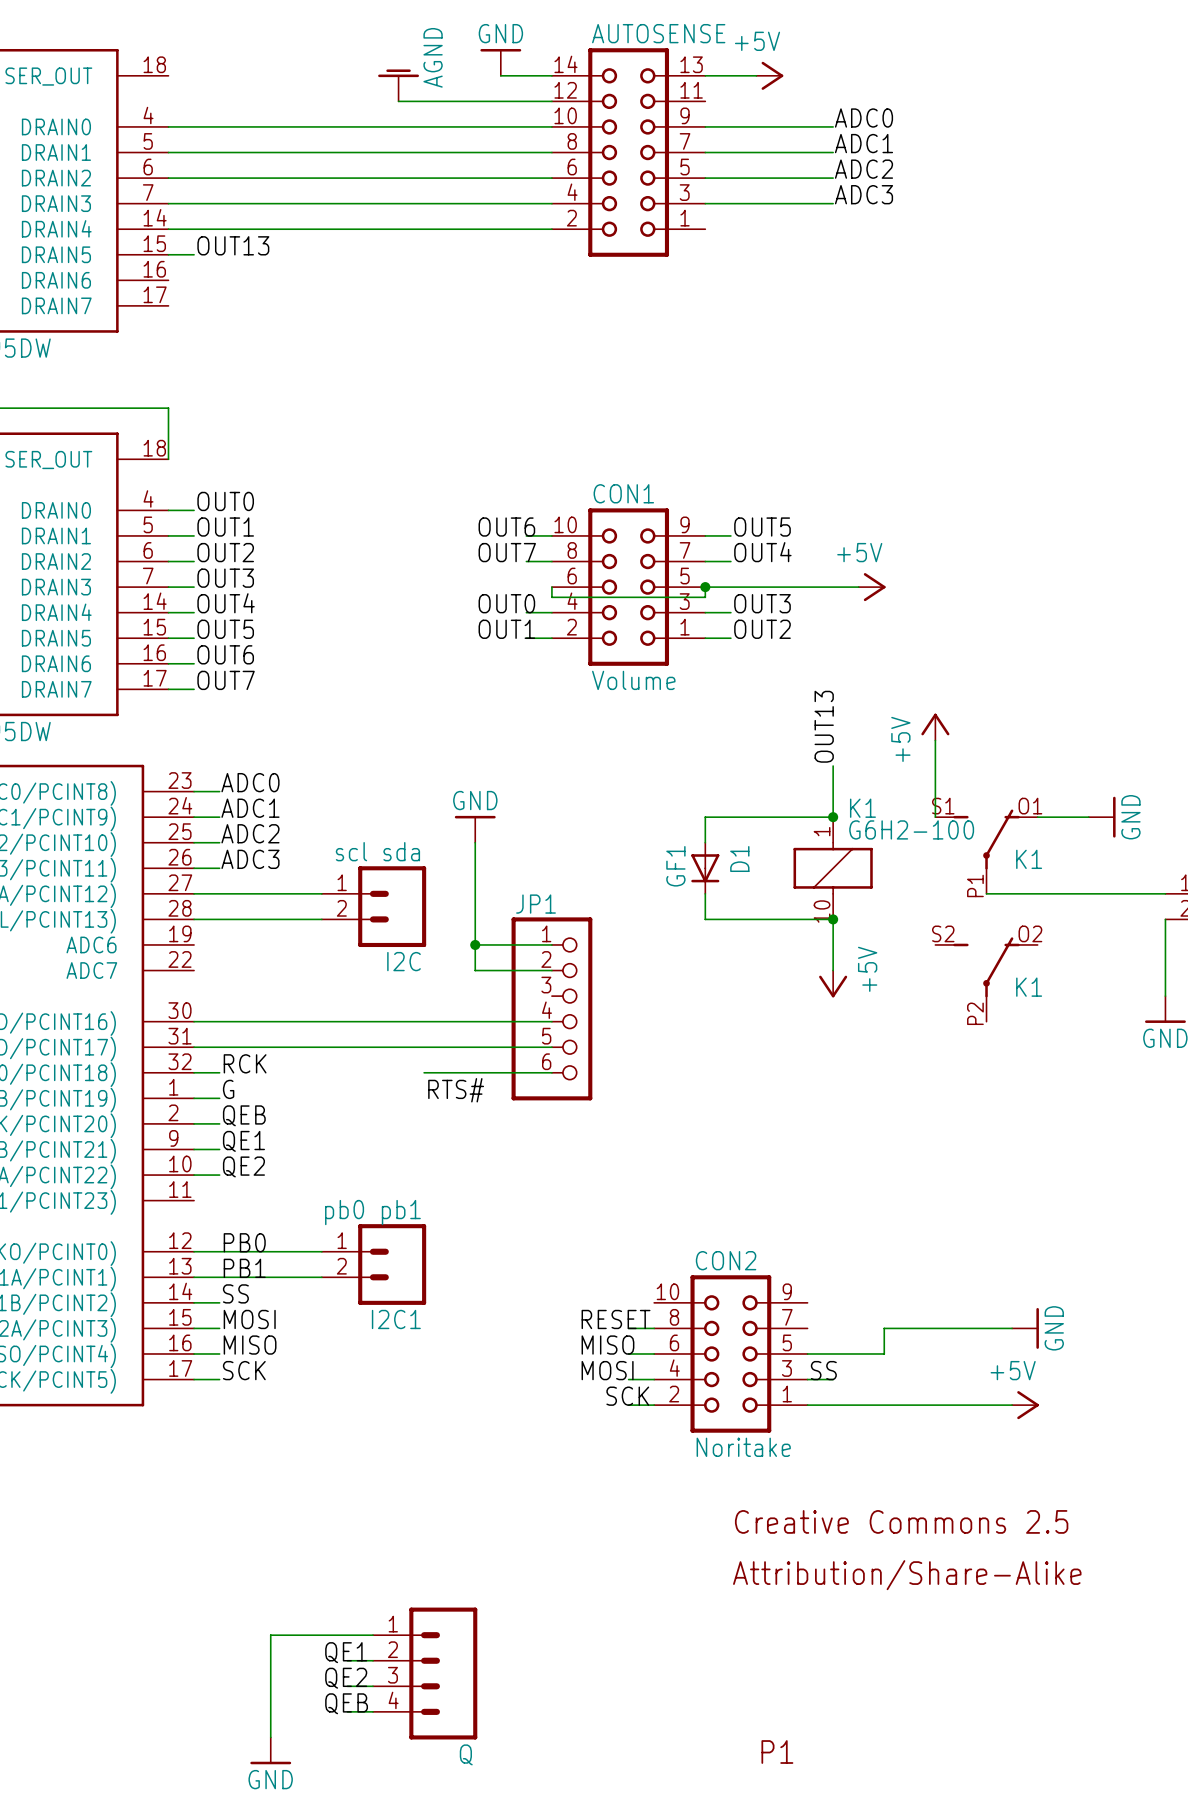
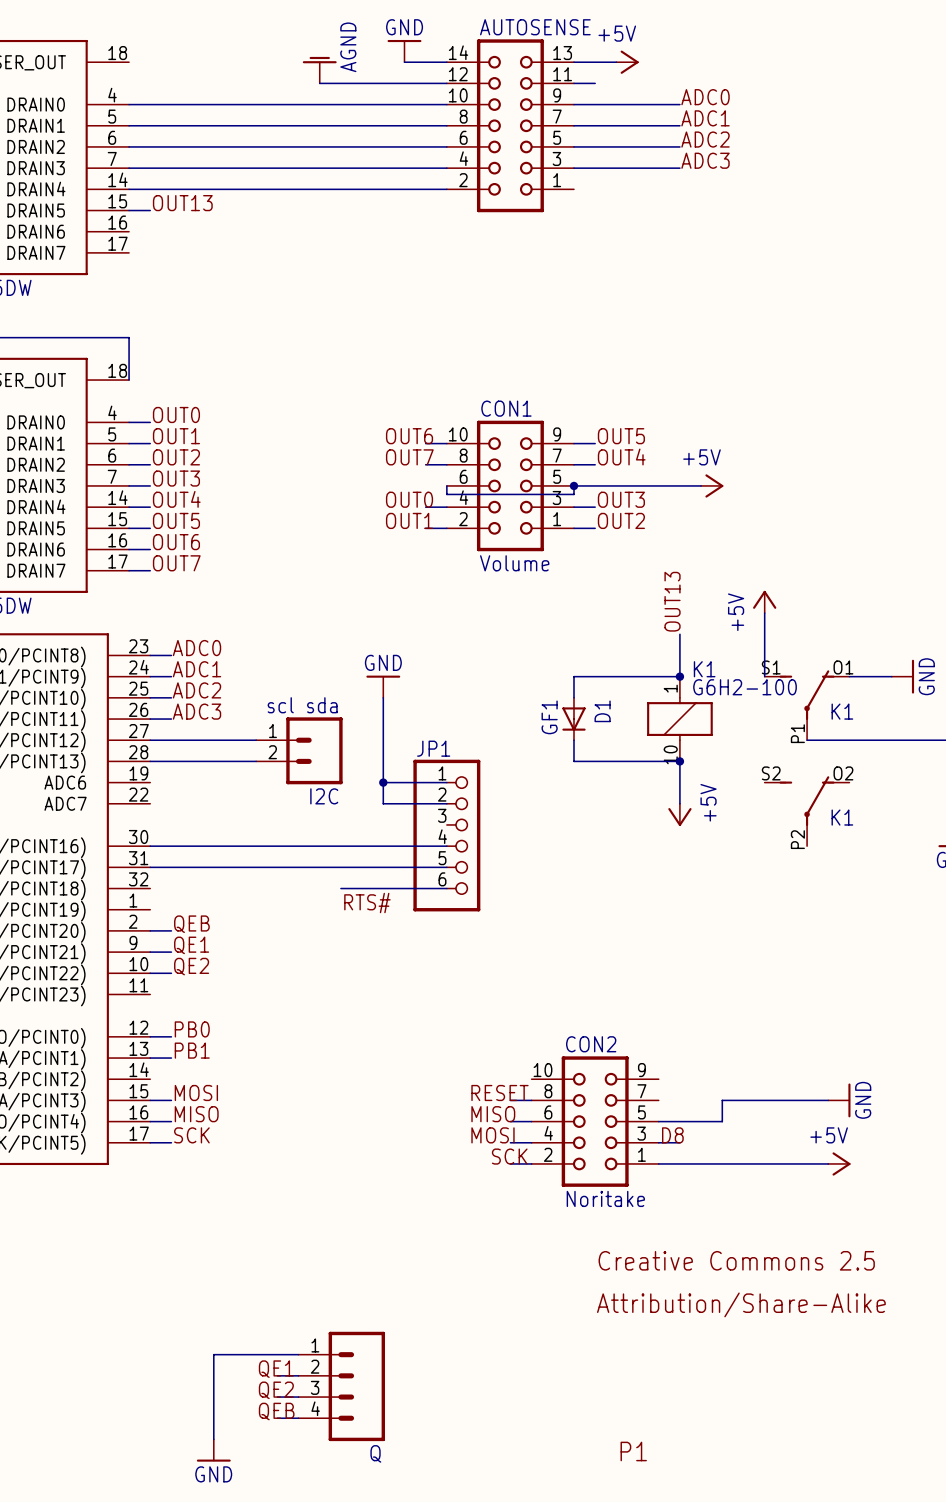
wire: none -> (573, 83) (595, 83)
label: RCK (245, 1063) -> none
wire: (194, 1072) (219, 1072) -> none
label: G (228, 1089) -> none
wire: (194, 1098) (219, 1098) -> none
wire: (219, 1251) (321, 1251) -> none
I2C1: pb0 pb1 (374, 1264) -> none
wire: (219, 1277) (321, 1277) -> none
label: SS (235, 1293) -> none
wire: (194, 1302) (219, 1302) -> none
label: SS (823, 1370) -> D8 (672, 1135)

